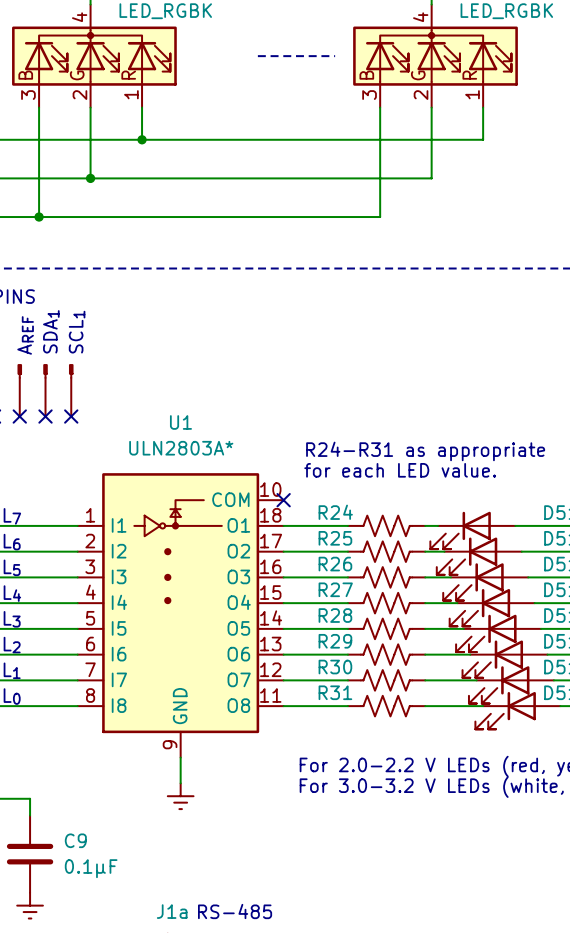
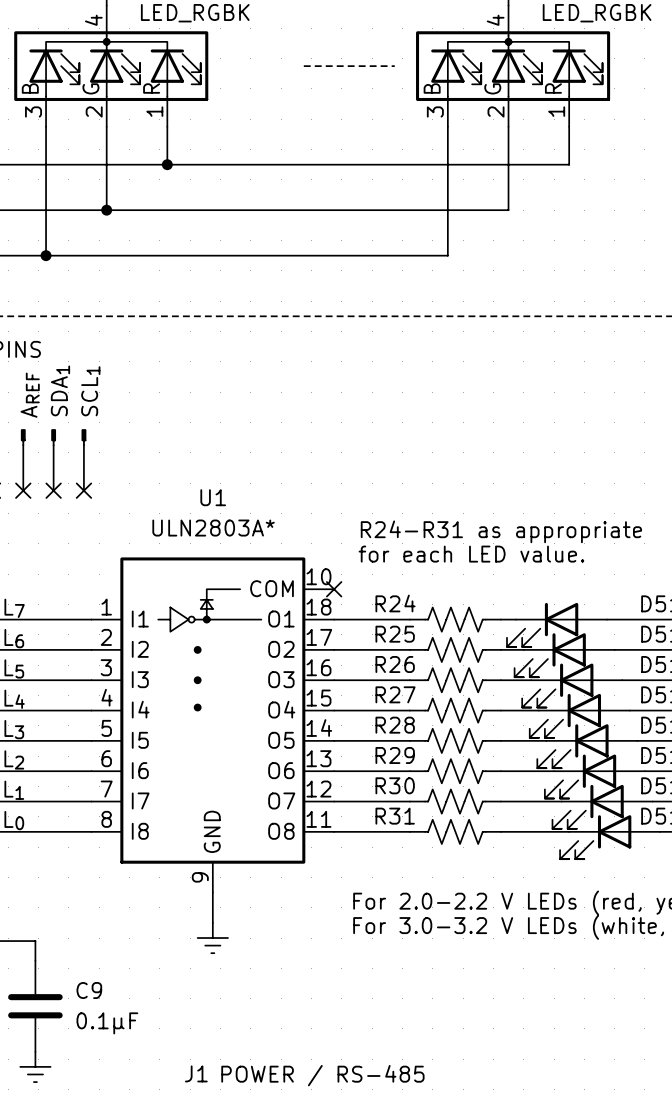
J1a name: J1a (172, 911) -> J1 (196, 1073)
text: RS-485 (235, 911) -> none
text: none -> POWER / RS-485 (322, 1075)

